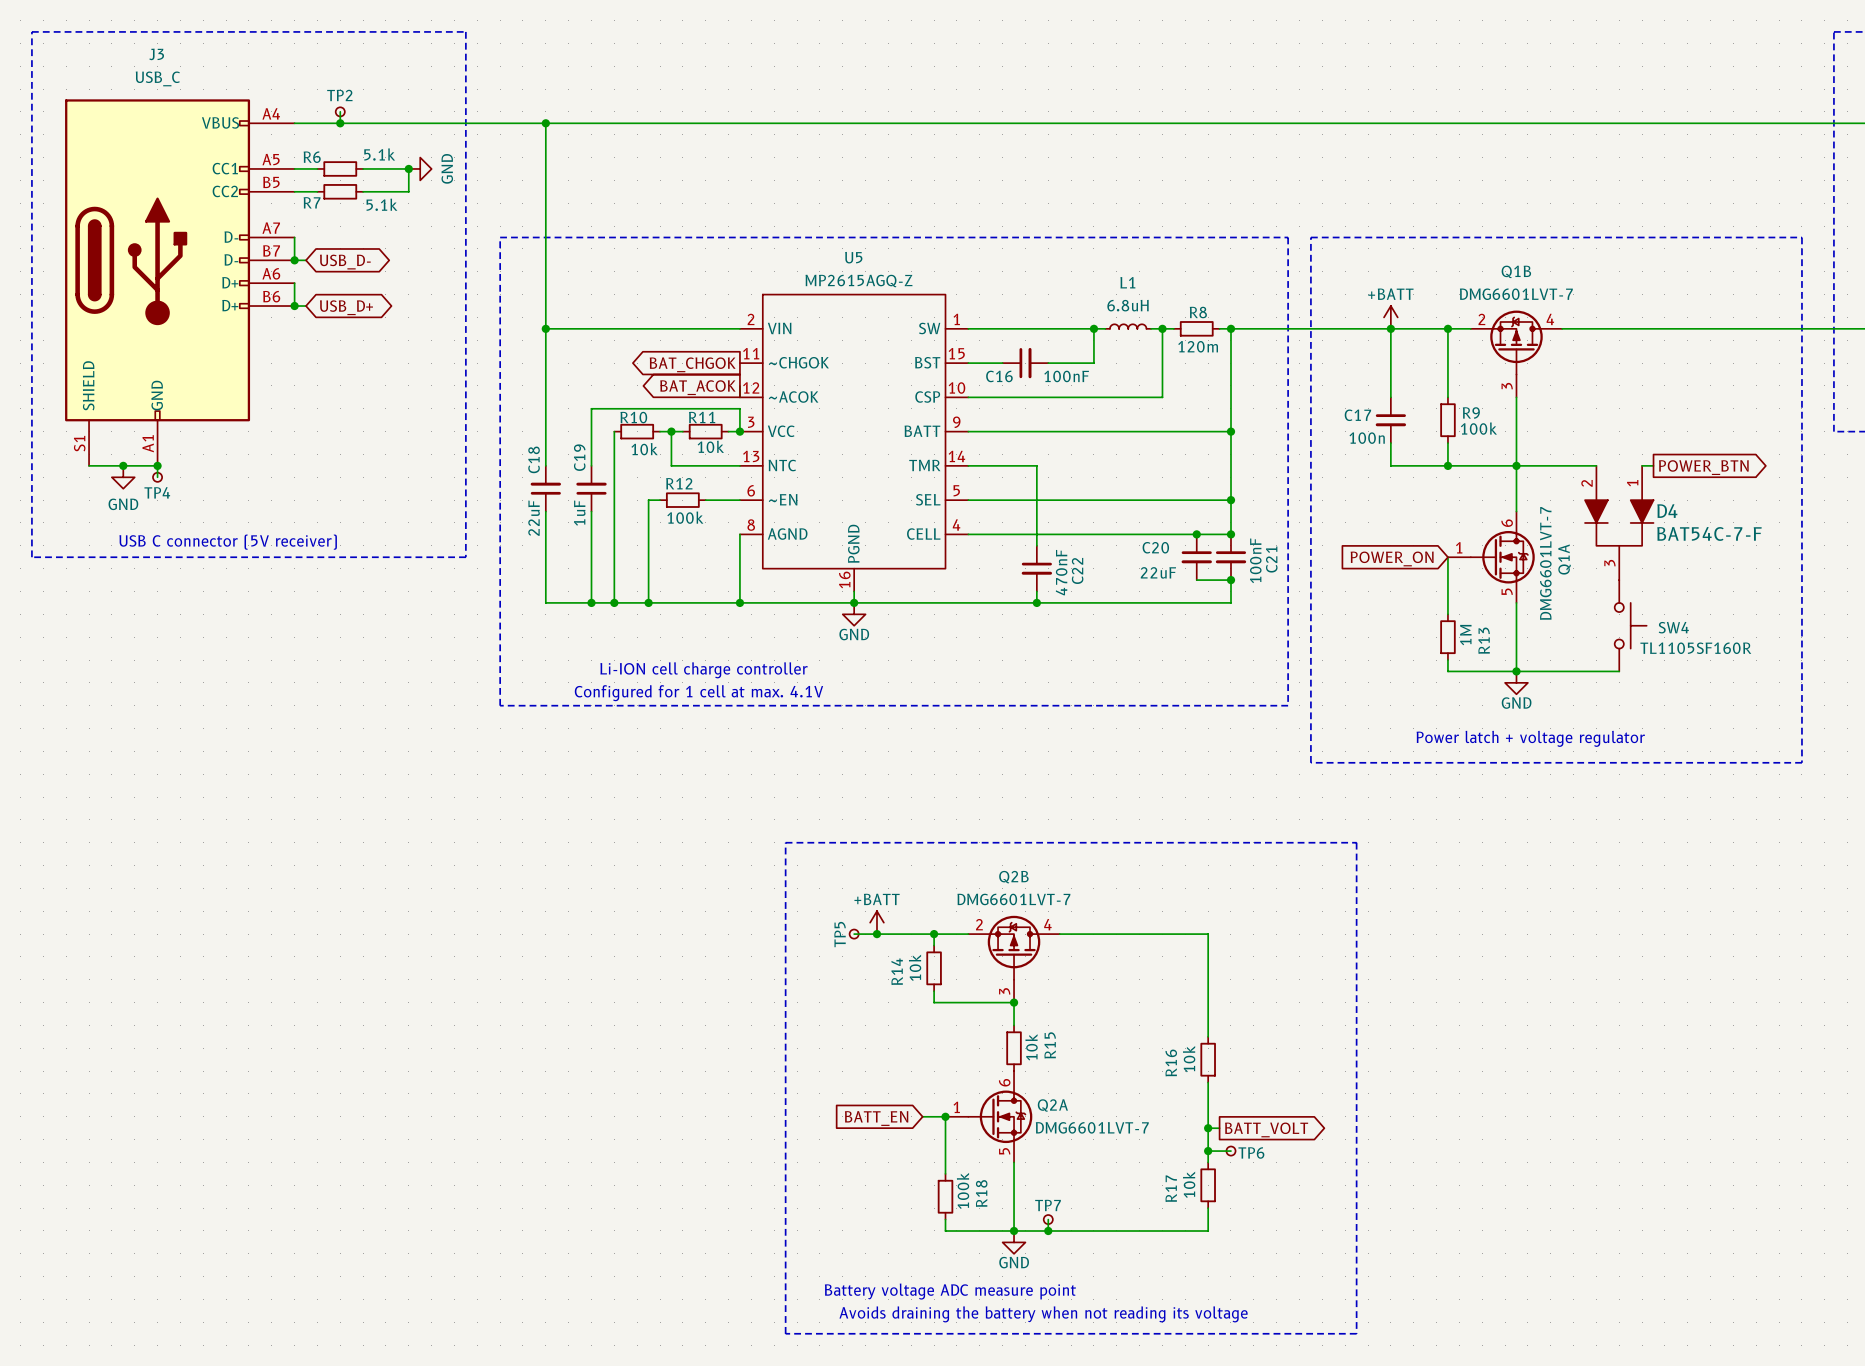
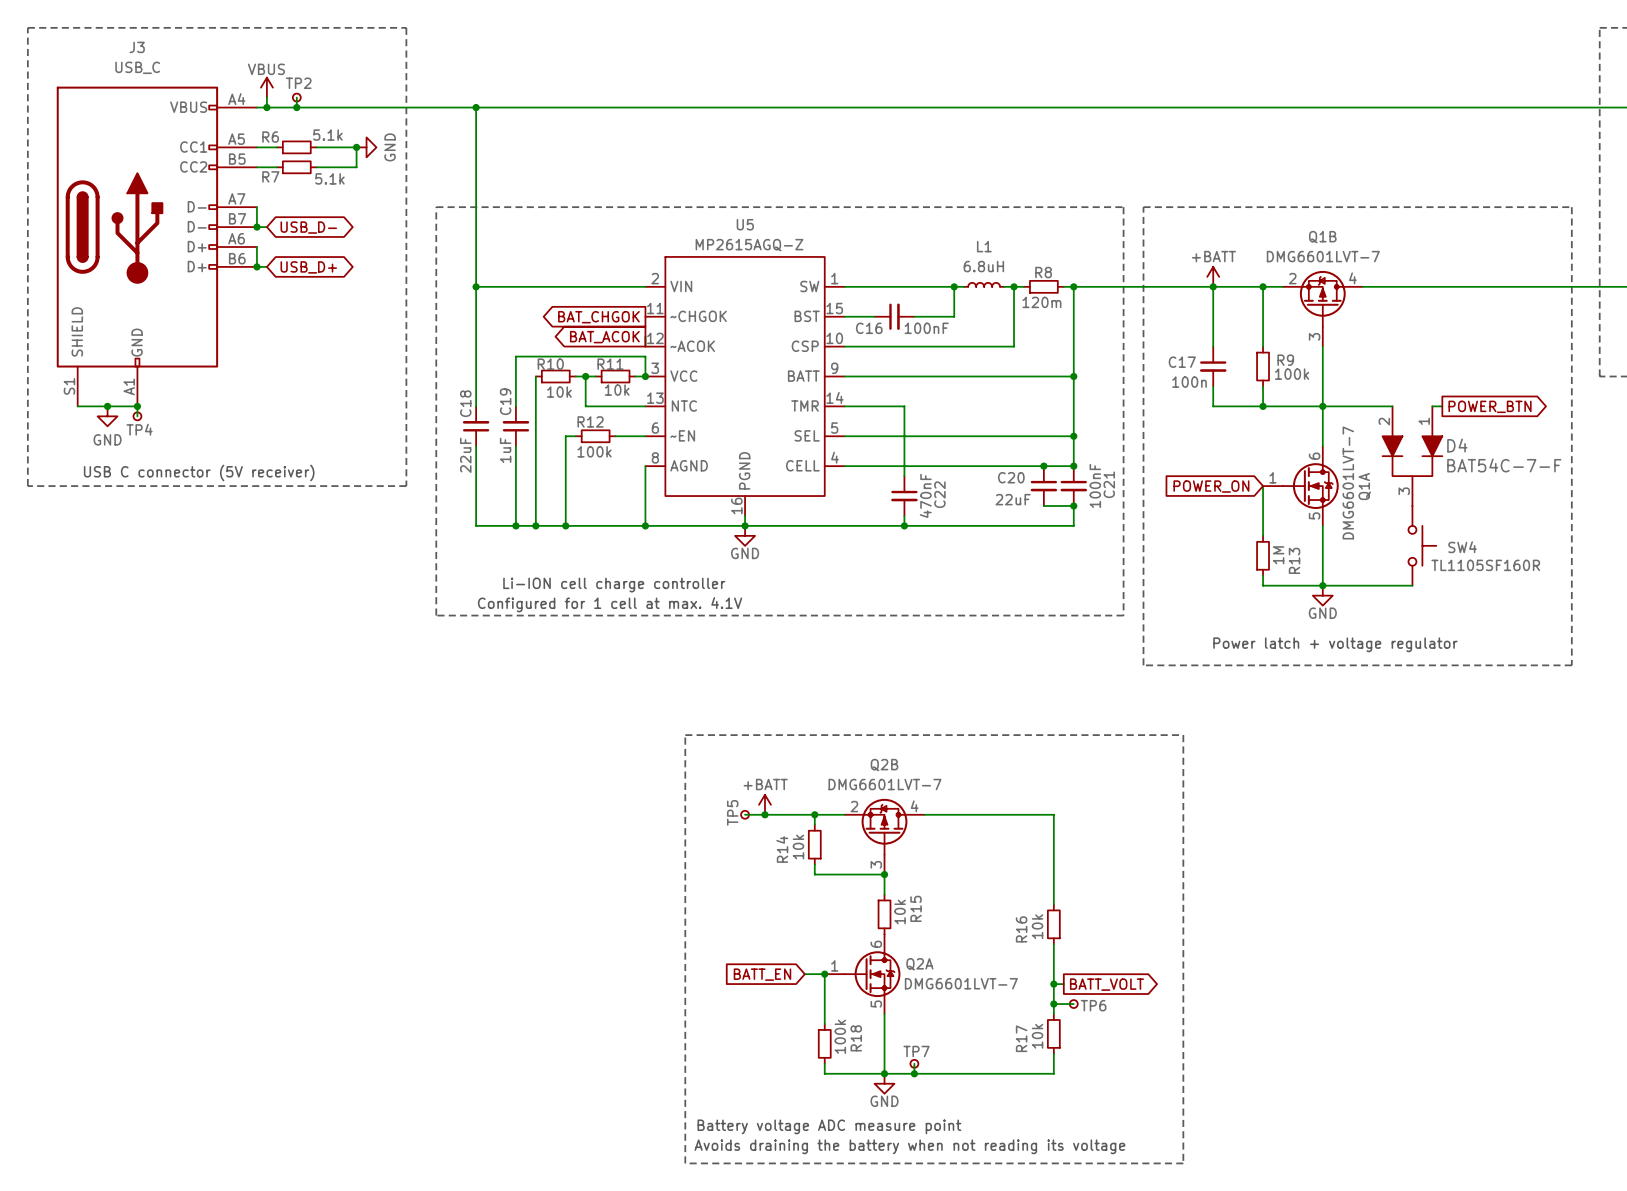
power symbol: none -> VBUS (266, 87)
wire: none -> (266, 97) (266, 107)
junction: none -> (266, 107)

